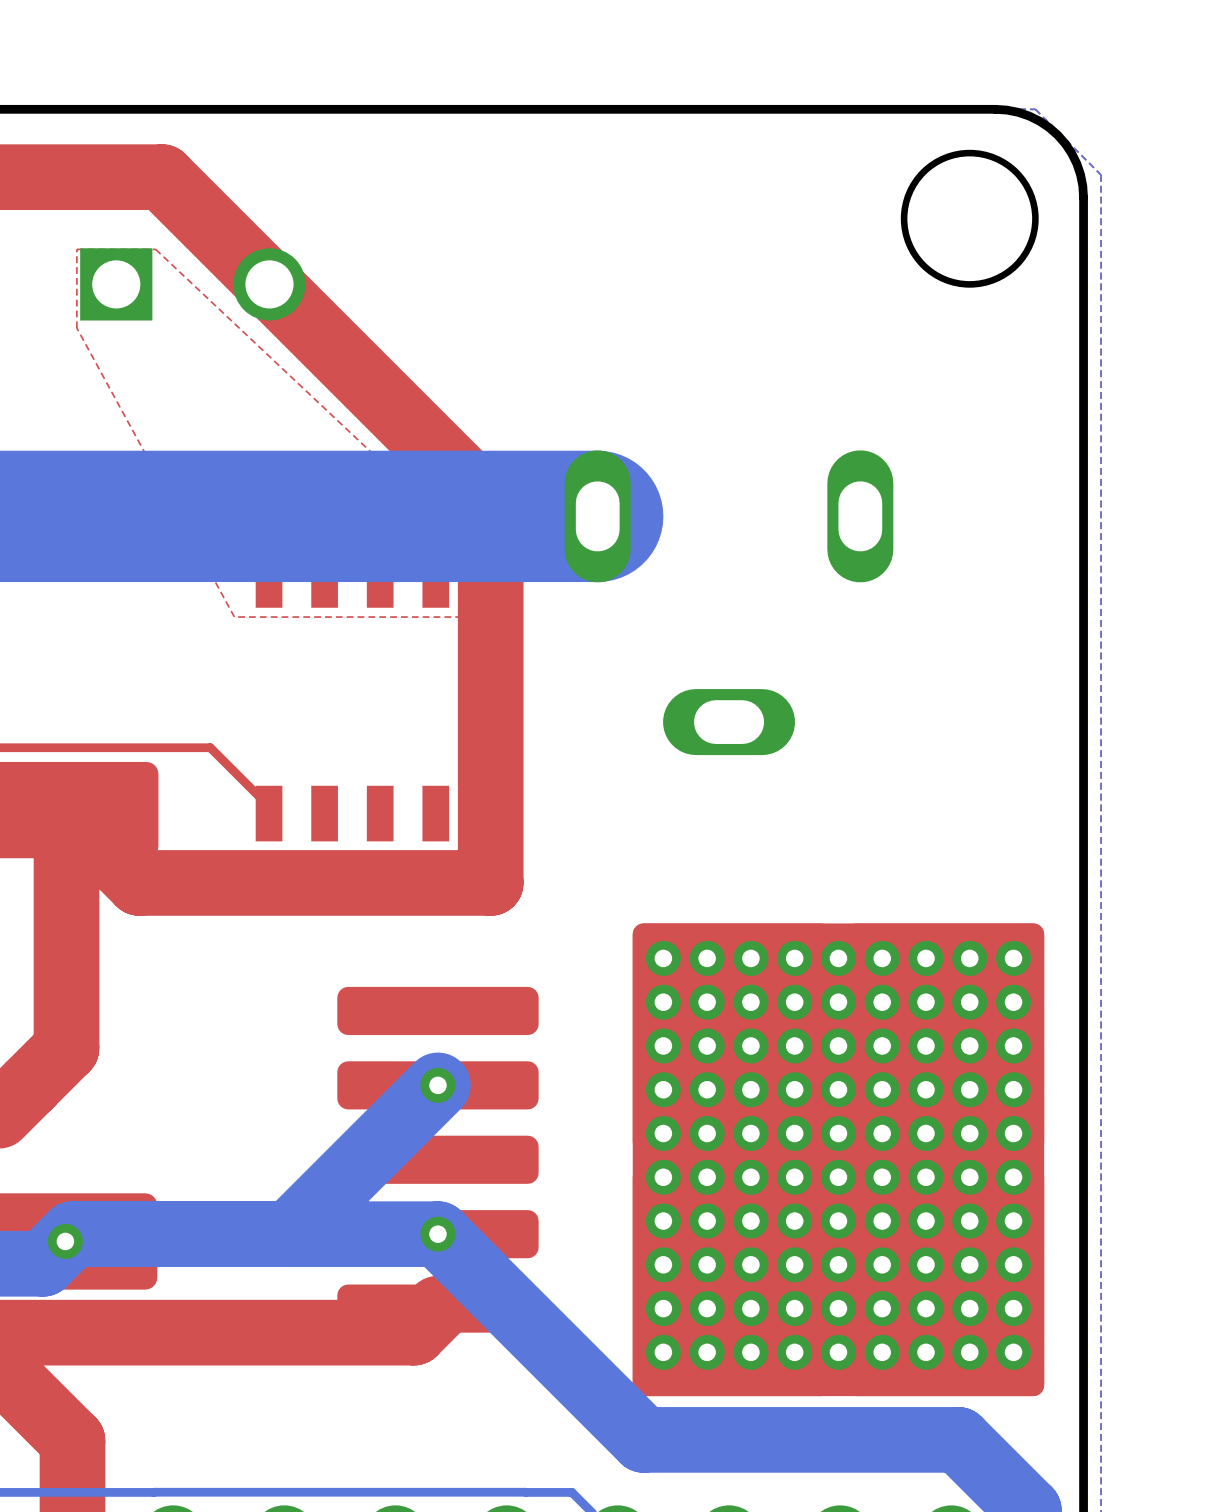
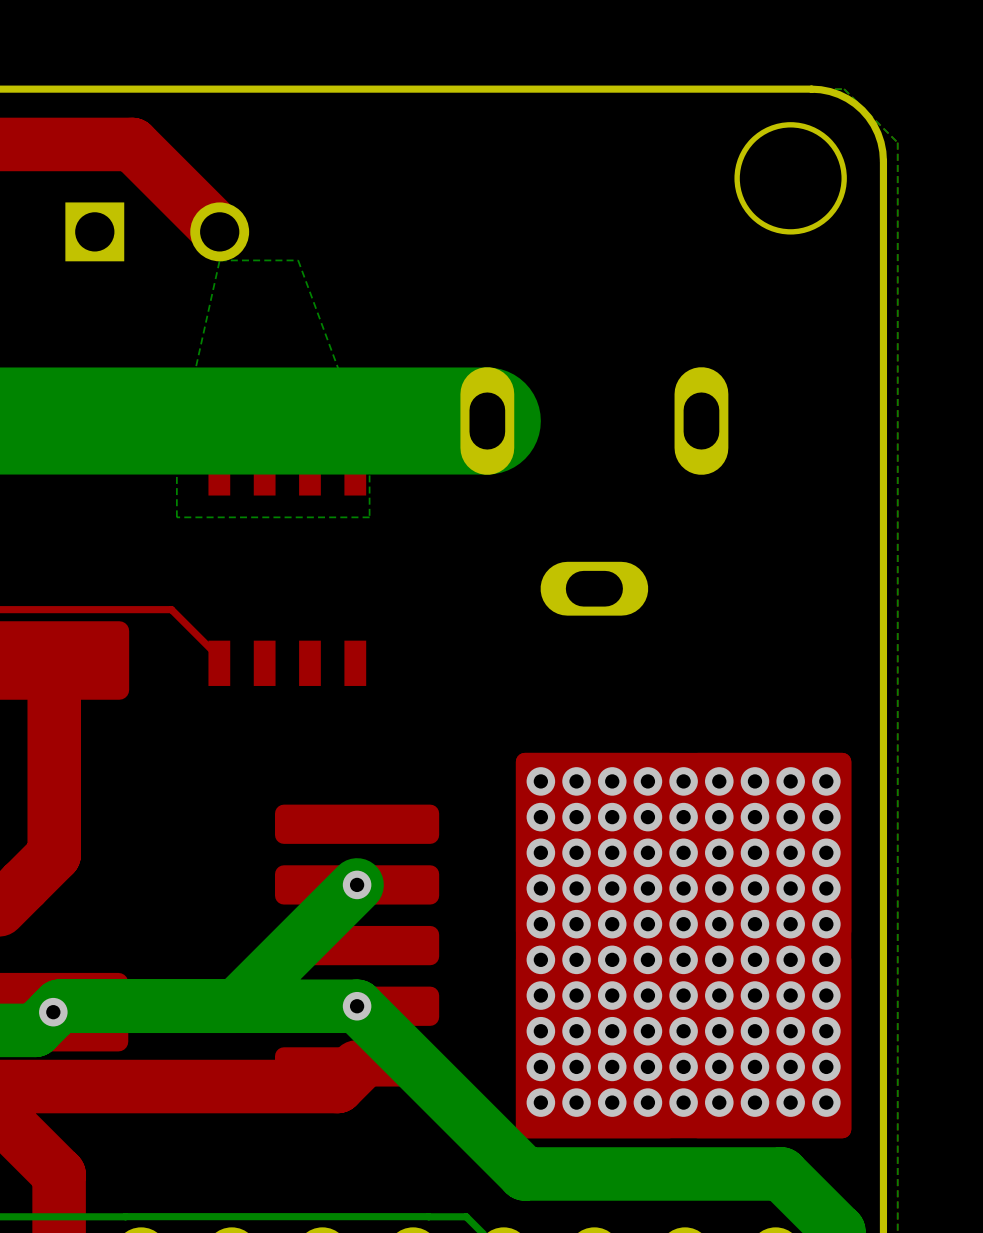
top zone outline: (155, 249) (453, 529) (462, 617) (234, 617) (76, 328) (76, 249) (155, 249) -> none
top track: (269, 284) (490, 505) (490, 882) (139, 882) (66, 810) -> none
bottom zone outline: none -> (298, 260) (369, 453) (369, 517) (176, 517) (176, 453) (219, 260) (298, 260)

